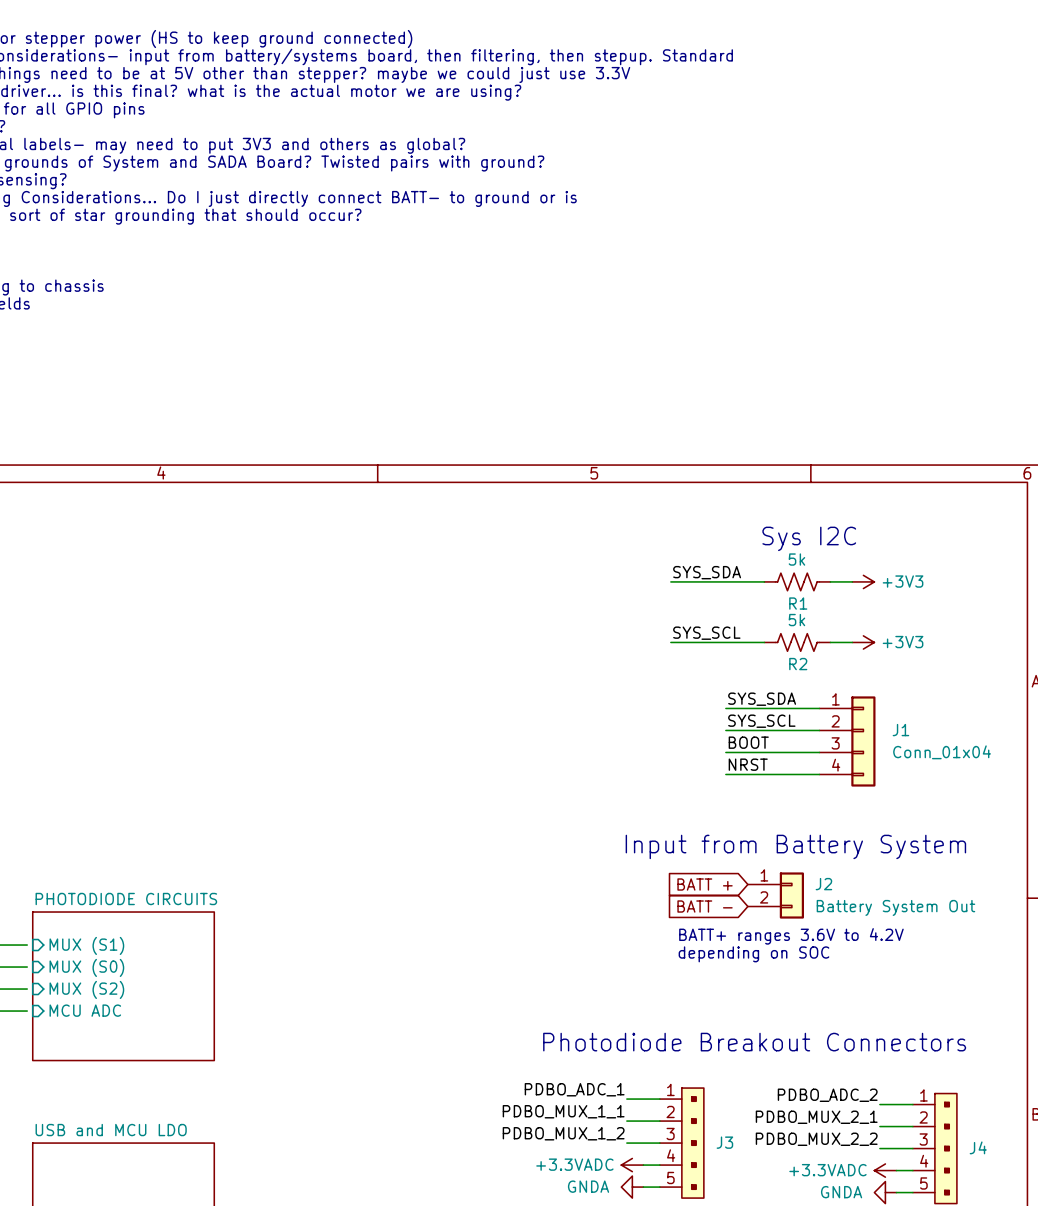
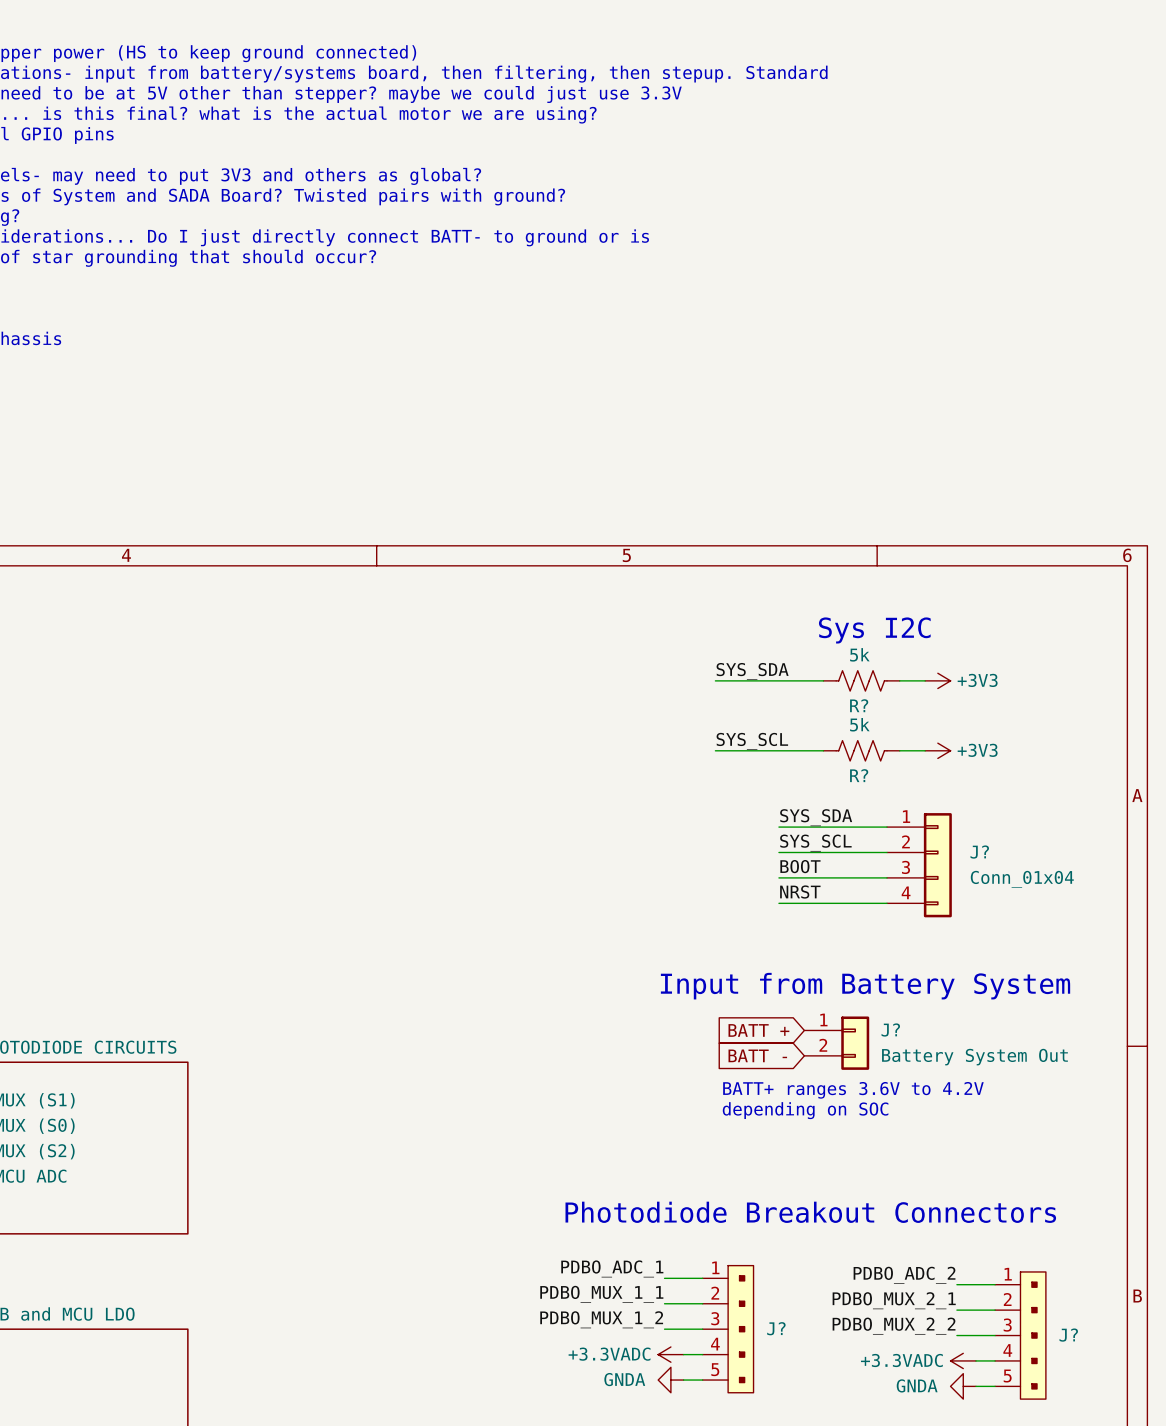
R1 name: R1 (798, 603) -> R? (859, 705)
R2 name: R2 (798, 664) -> R? (859, 775)
J1 name: J1 (900, 730) -> J? (979, 852)
J2 name: J2 (823, 884) -> J? (890, 1029)
J3 name: J3 (724, 1142) -> J? (776, 1328)
J4 name: J4 (978, 1147) -> J? (1068, 1335)

